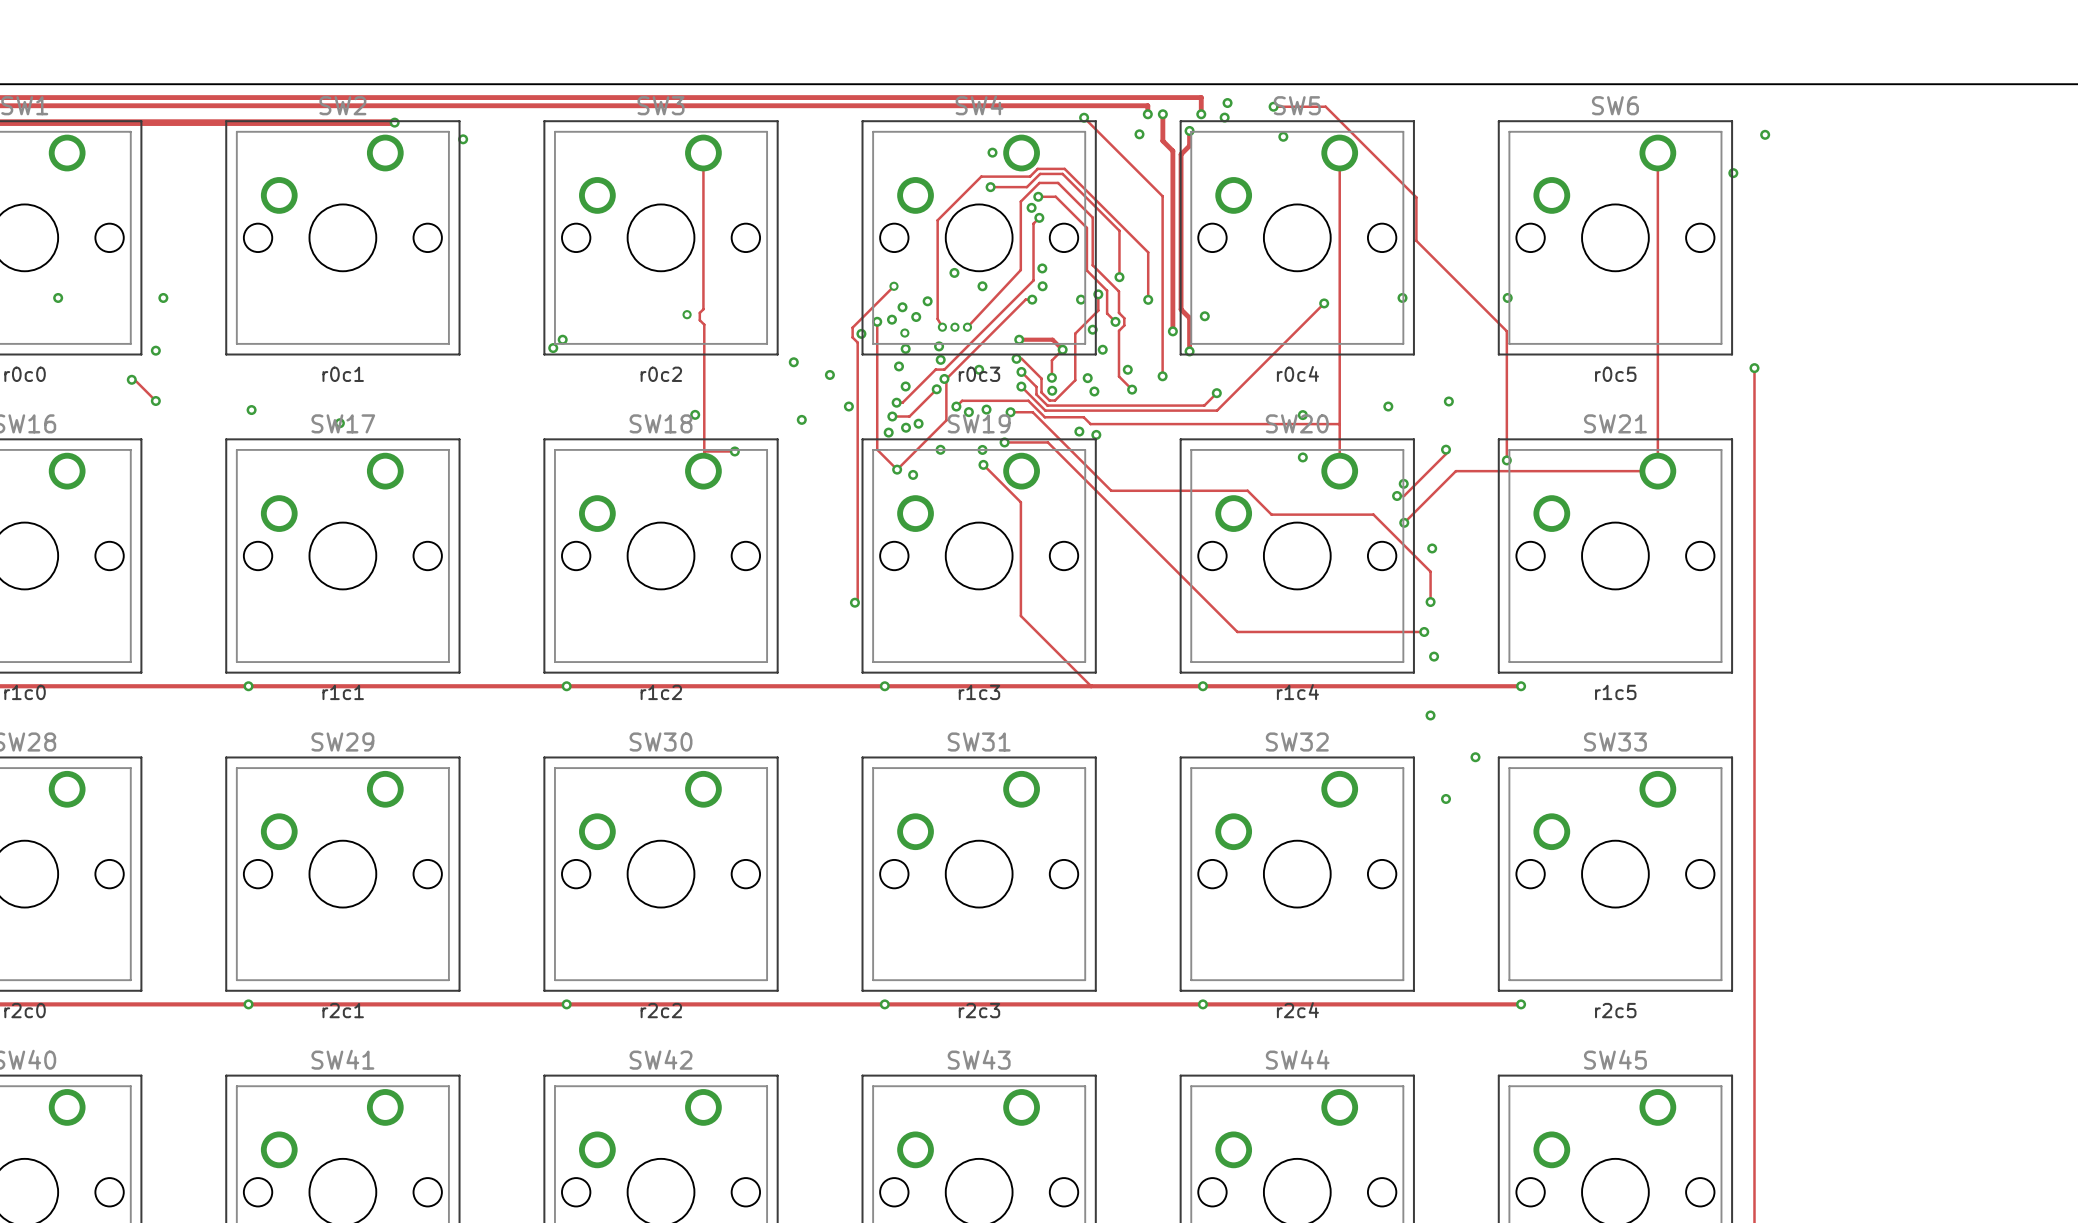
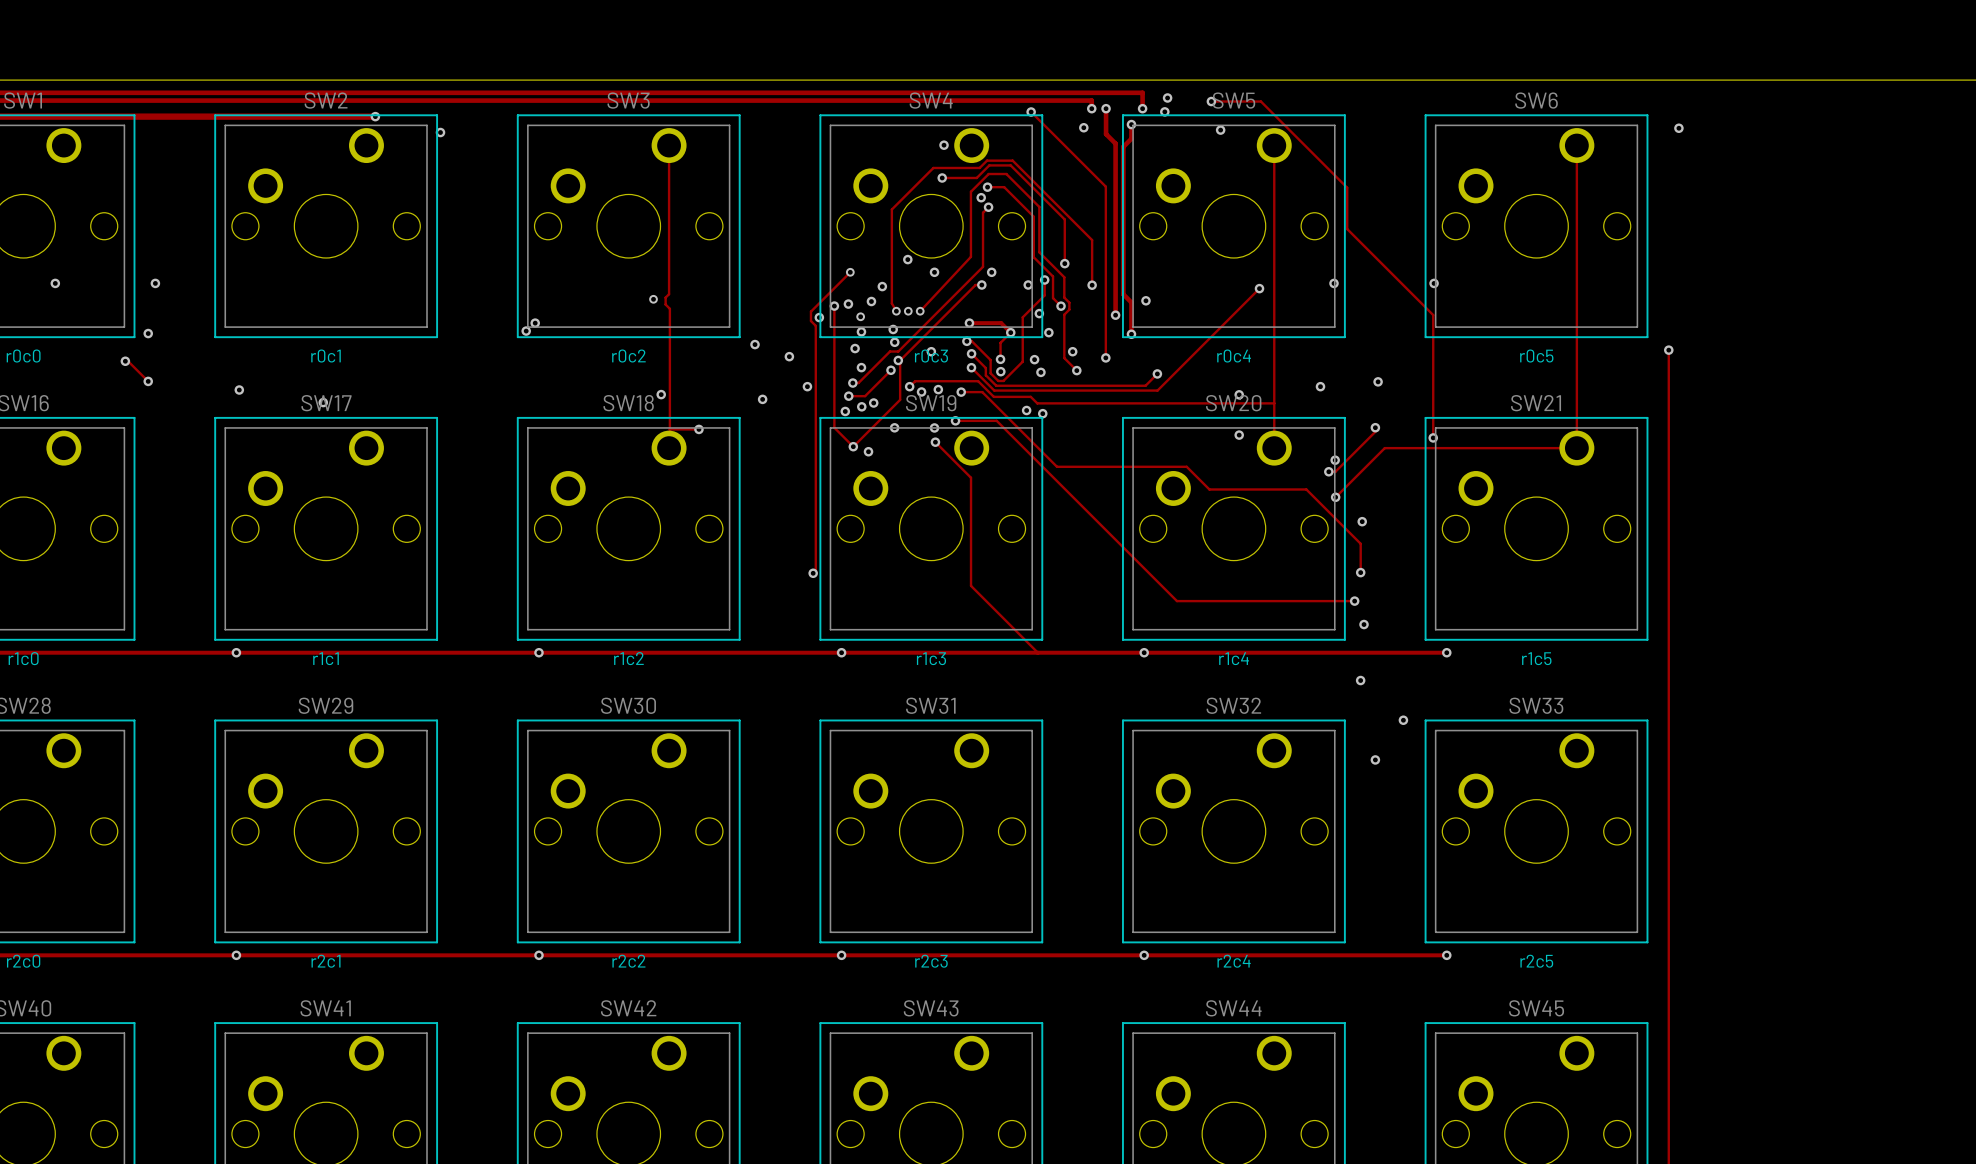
via: (1733, 173) -> none
via: (1042, 268) -> none
via: (902, 307) -> none

